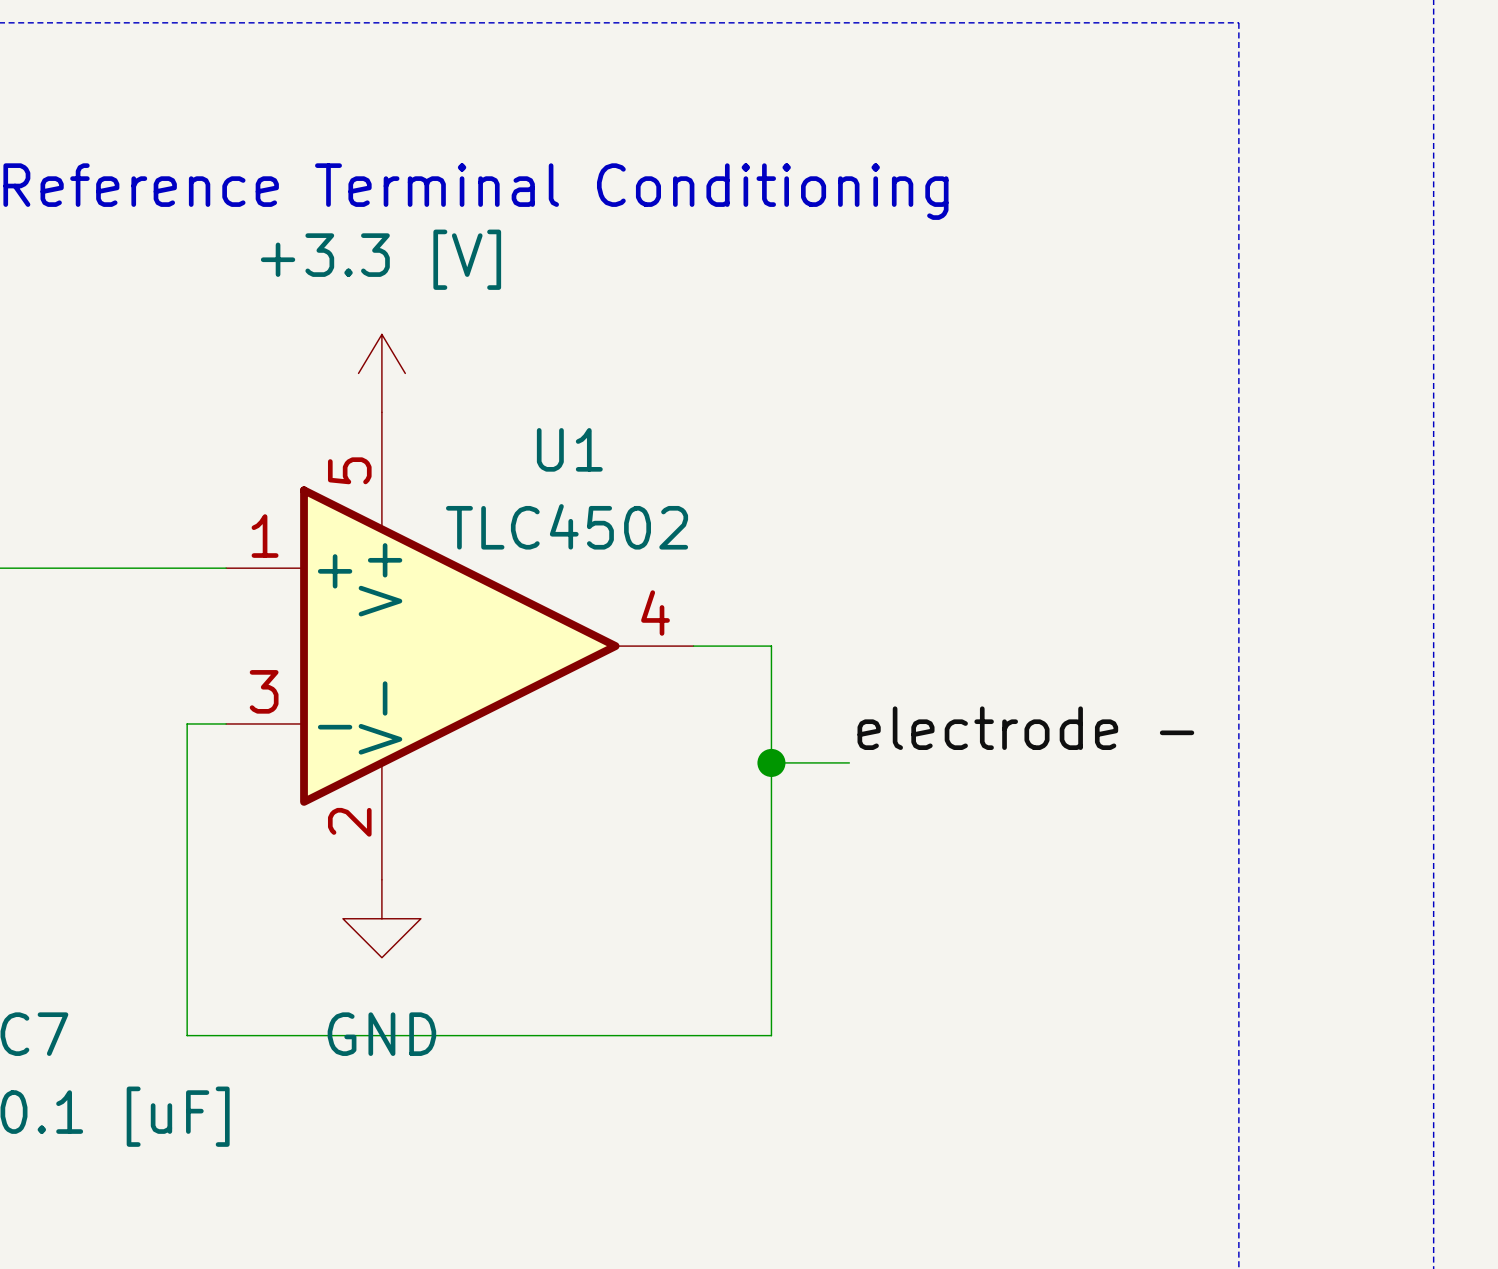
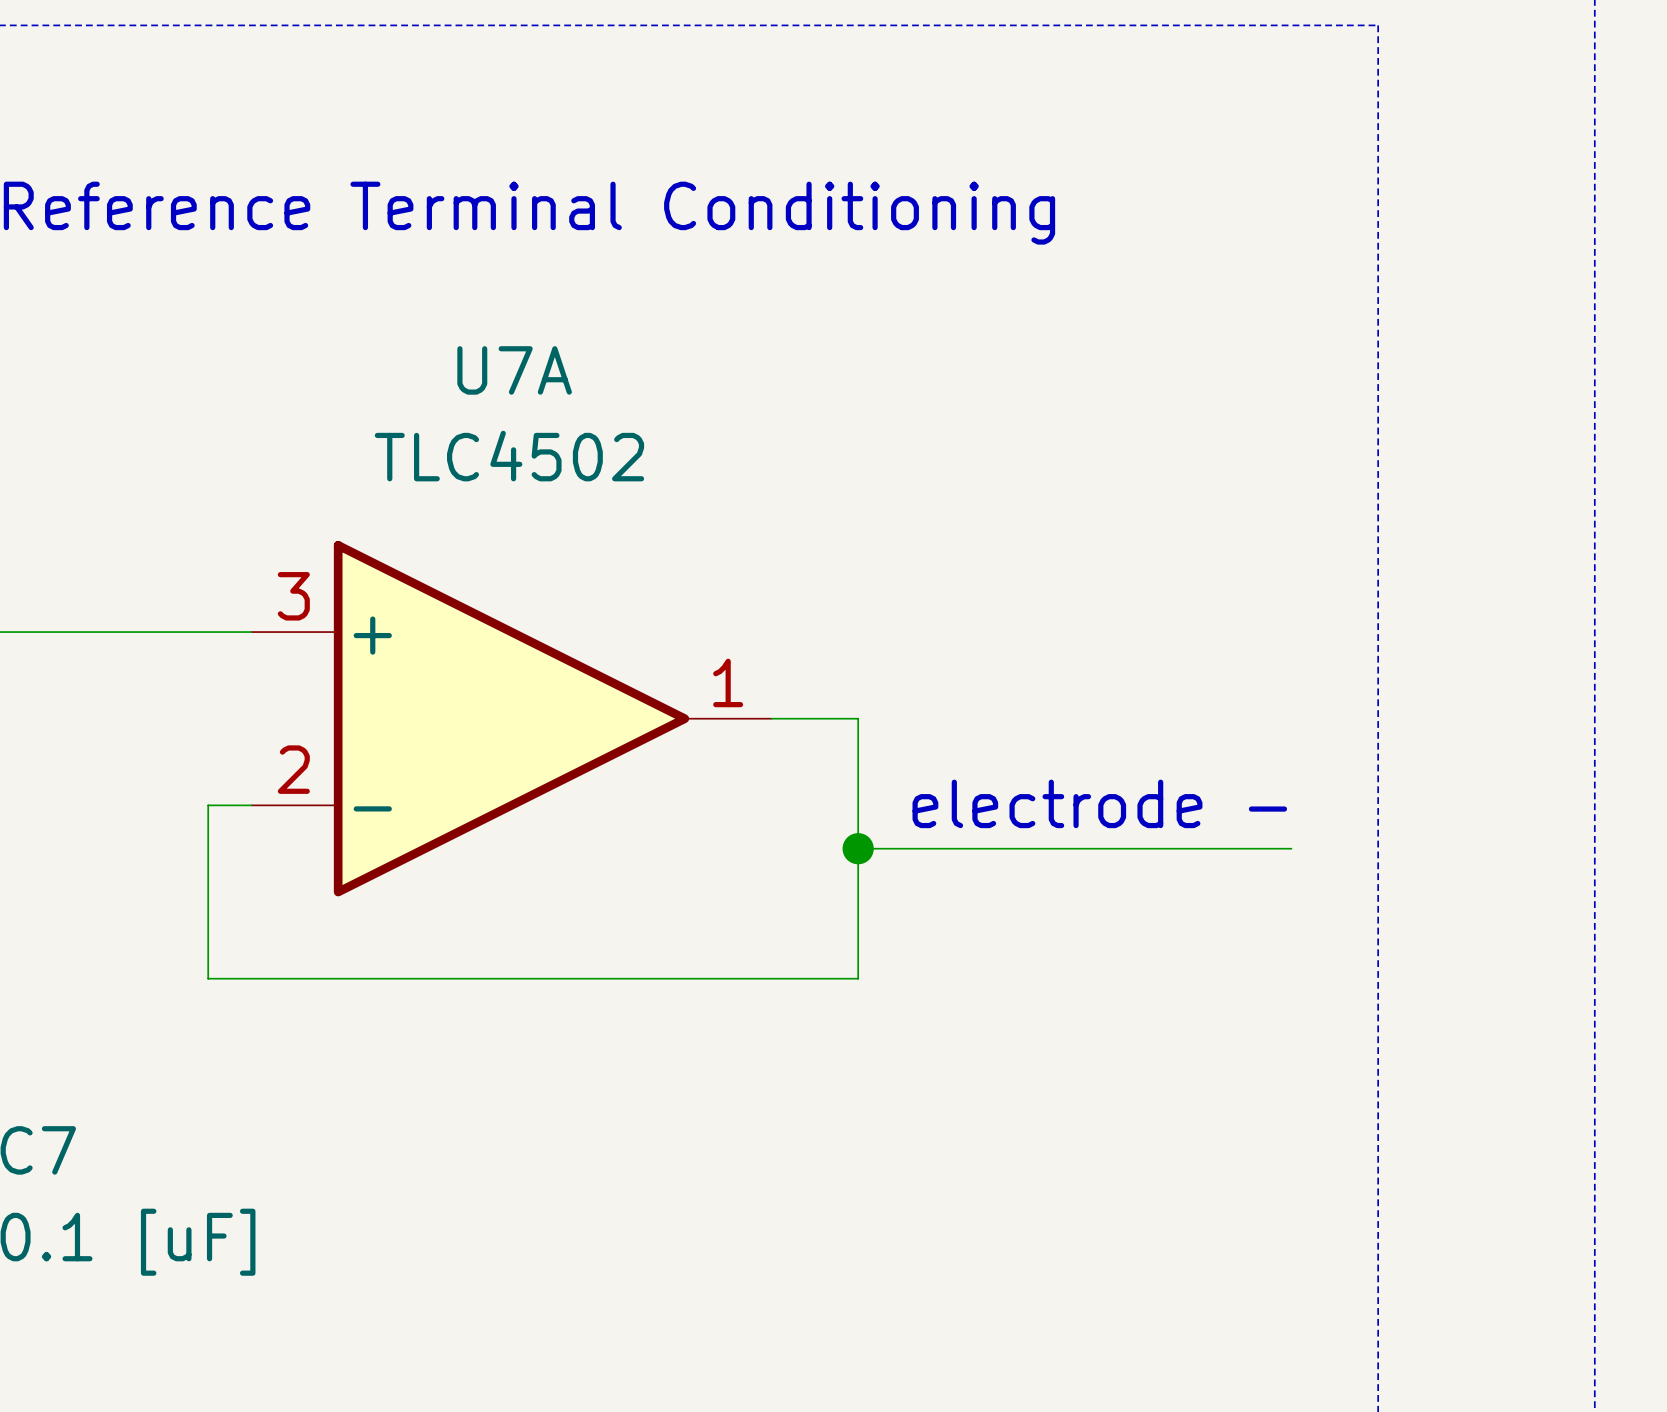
power symbol: +3.3 [V] (381, 373) -> none
U1: TLC4502 (459, 646) -> none
U7A: none -> TLC4502 (511, 718)
text: none -> electrode - (1099, 803)
label: electrode - (1025, 728) -> none
wire: none -> (944, 848) (1291, 848)
wire: (187, 879) (187, 1035) (771, 1035) (771, 879) -> (208, 978) (858, 978)
power symbol: GND (381, 918) -> none

